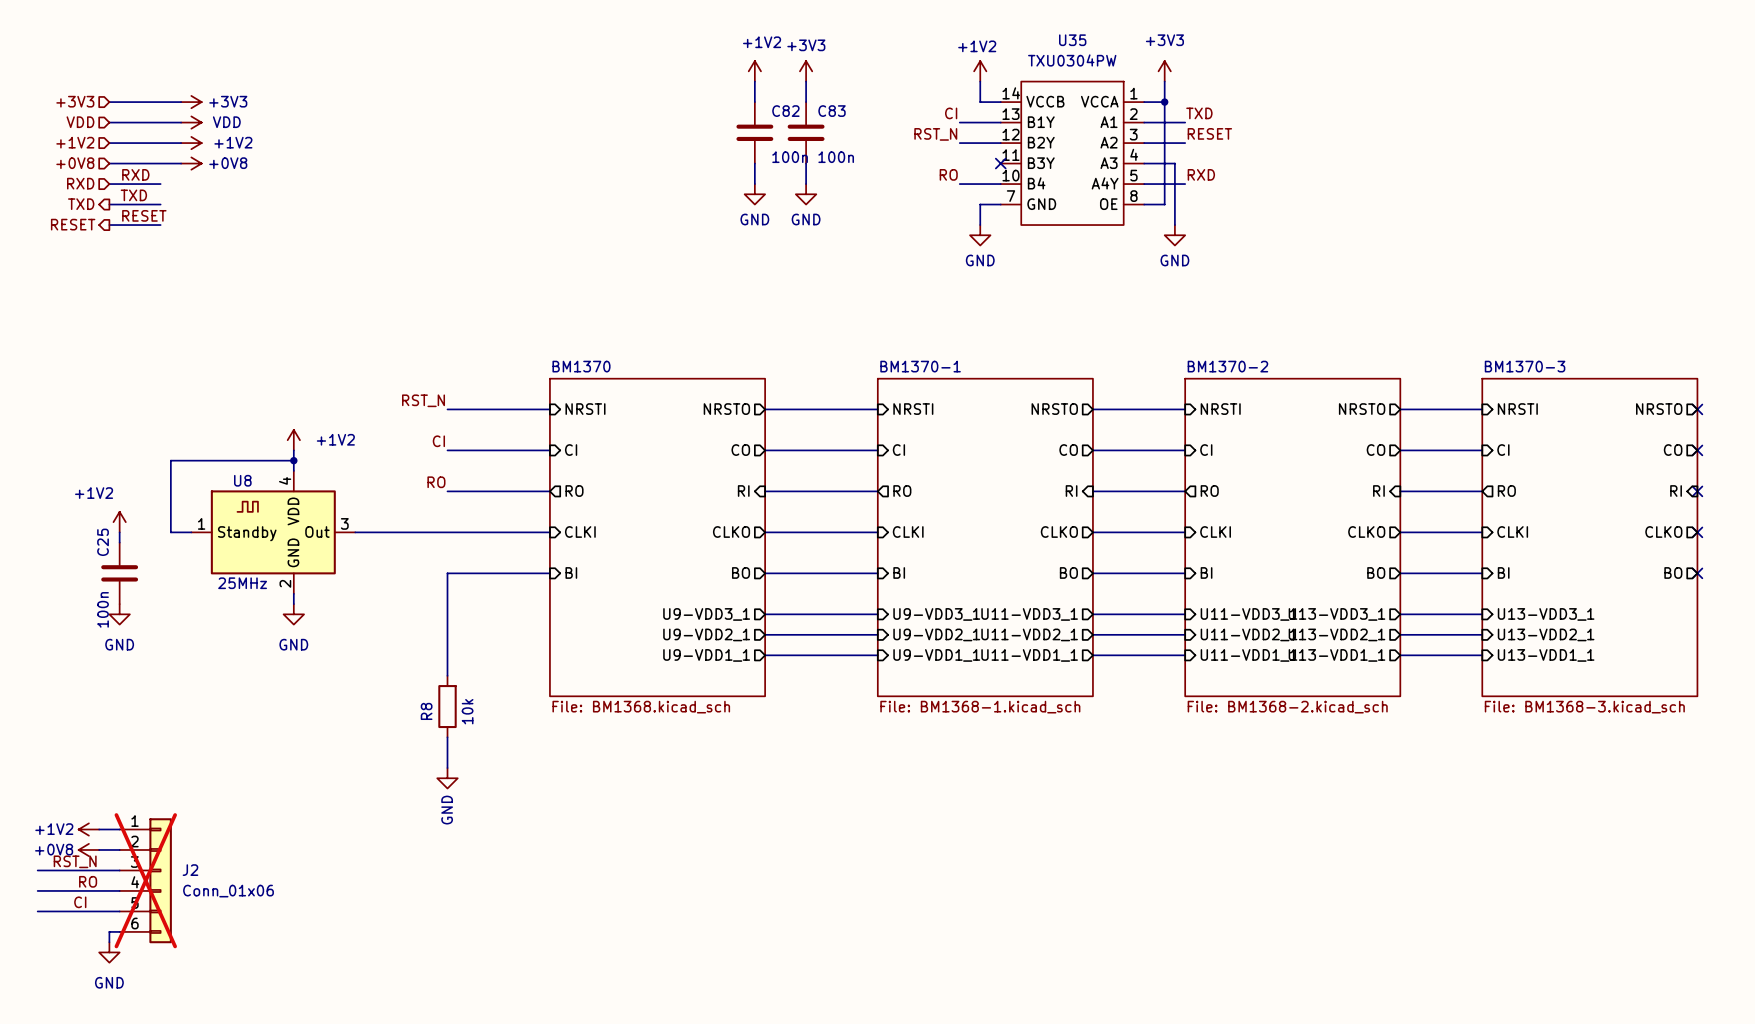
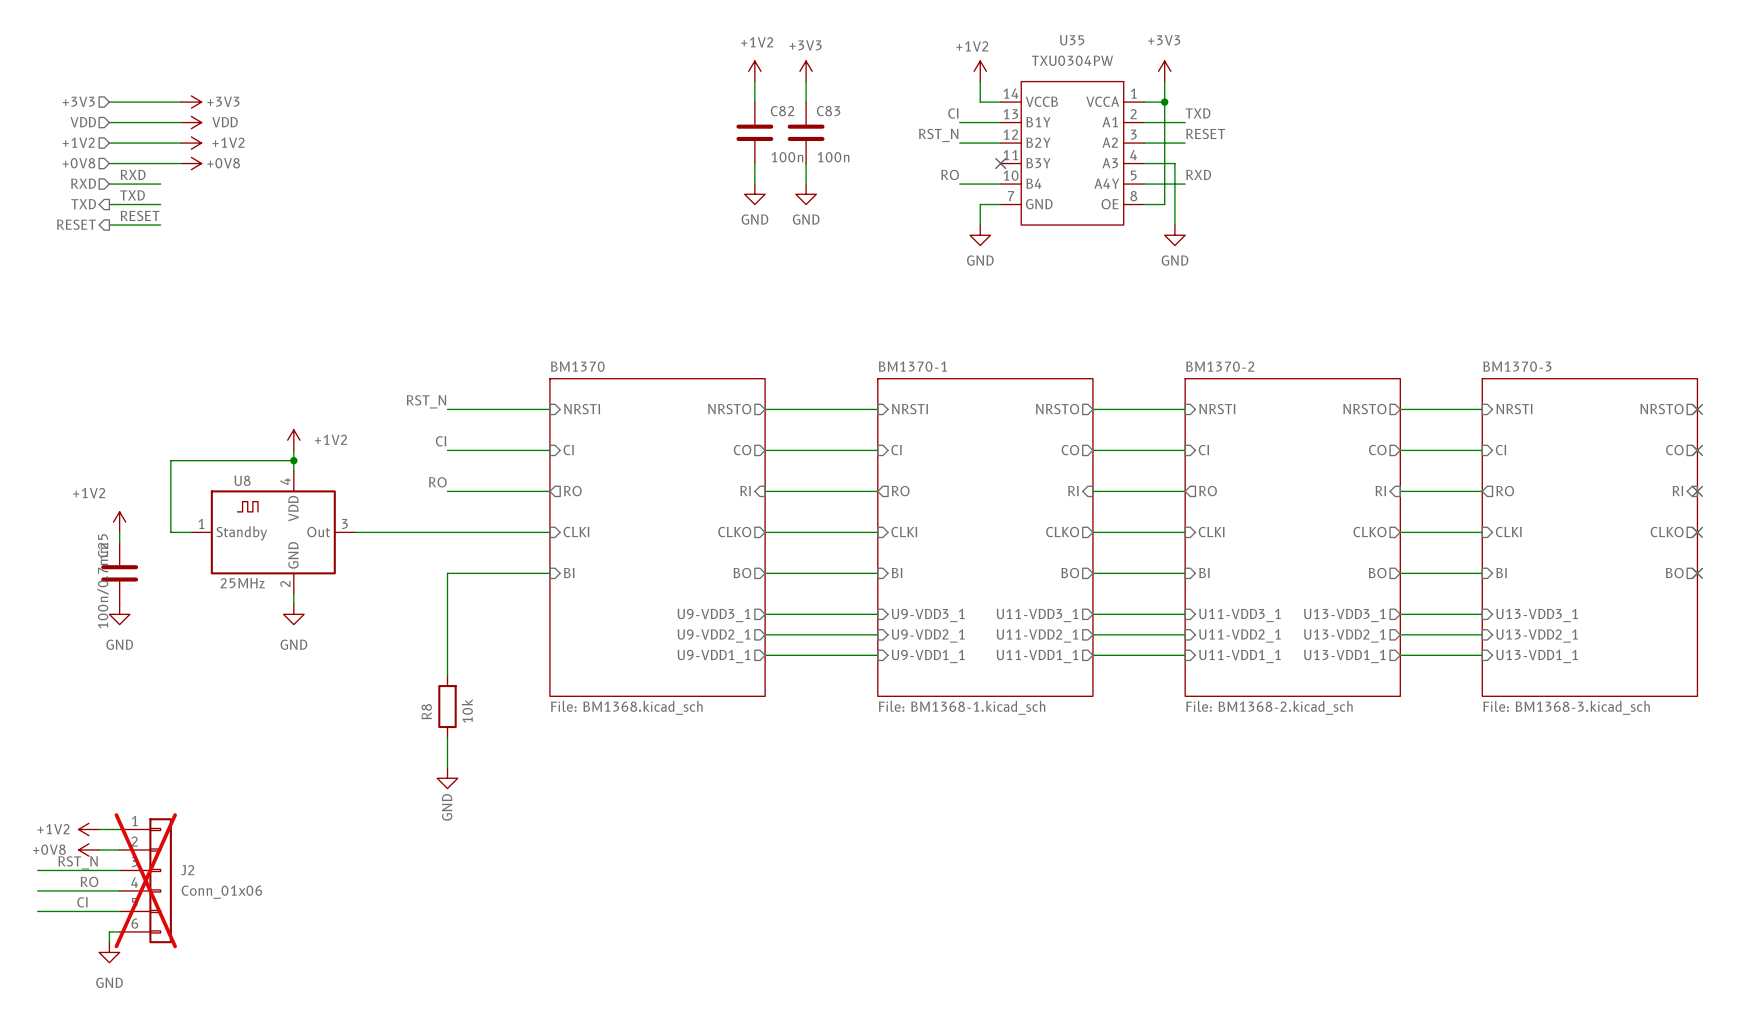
C25 value: 100n (103, 609) -> 100n/0.7mm (103, 585)

